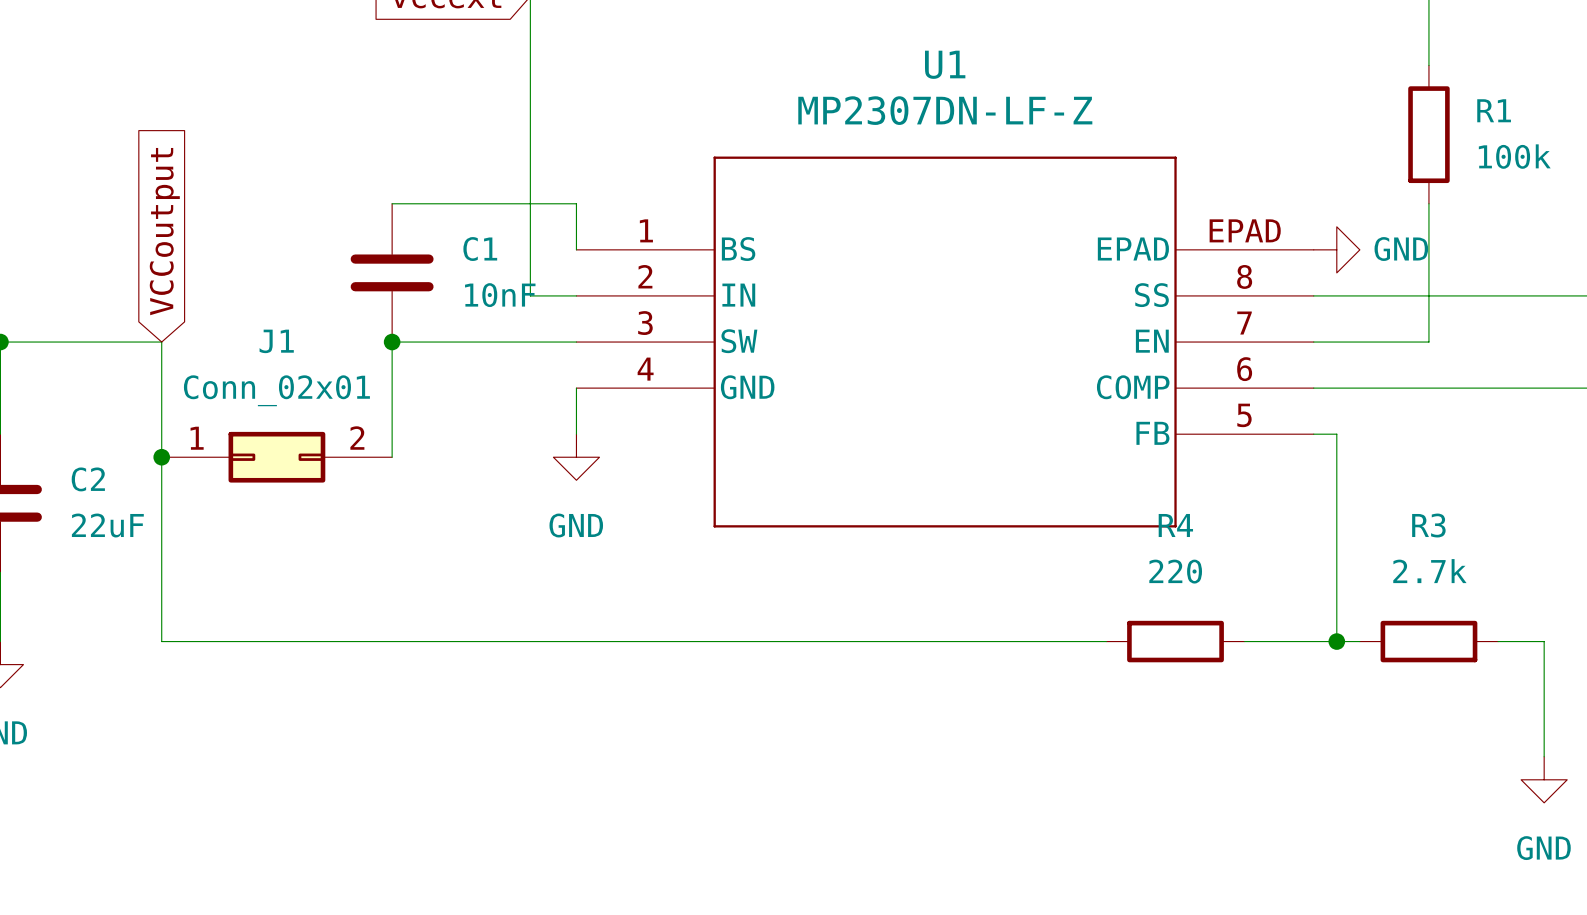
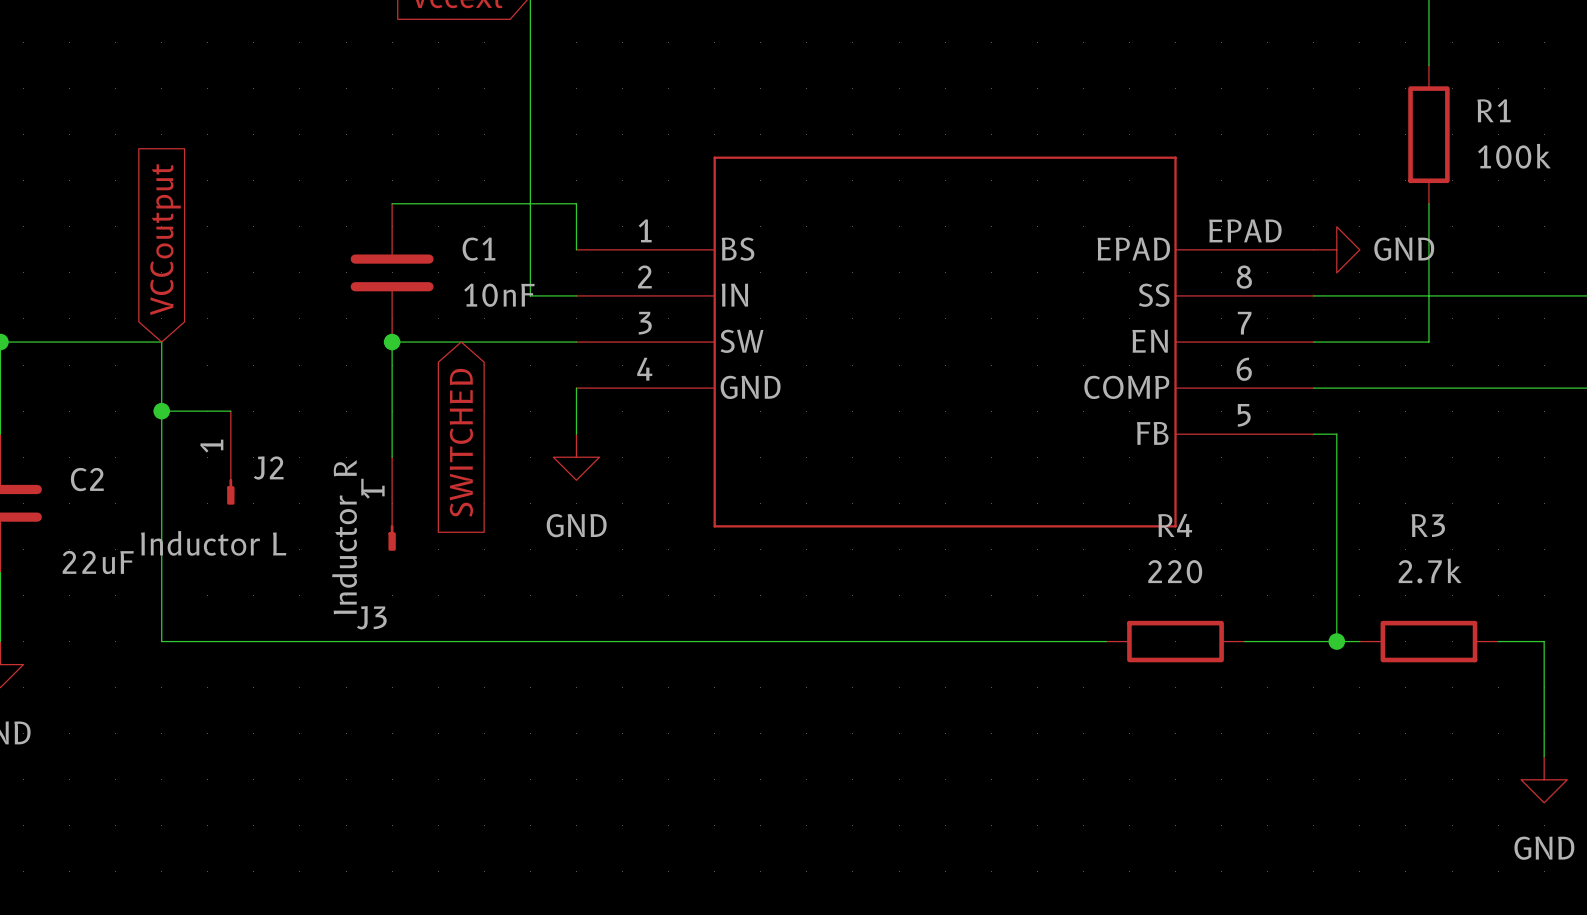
U1 name: U1 (945, 64) -> none
U1 value: MP2307DN-LF-Z (945, 110) -> none
wire: none -> (161, 411) (230, 411)
global label: none -> SWITCHED (461, 442)
junction position: (161, 457) -> (161, 411)
J2: none -> Inductor L (230, 457)
J1: Conn_02x01 (276, 457) -> none
J3: none -> Inductor_R (392, 504)
C2 value position: 22uF (107, 525) -> 22uF (98, 562)

